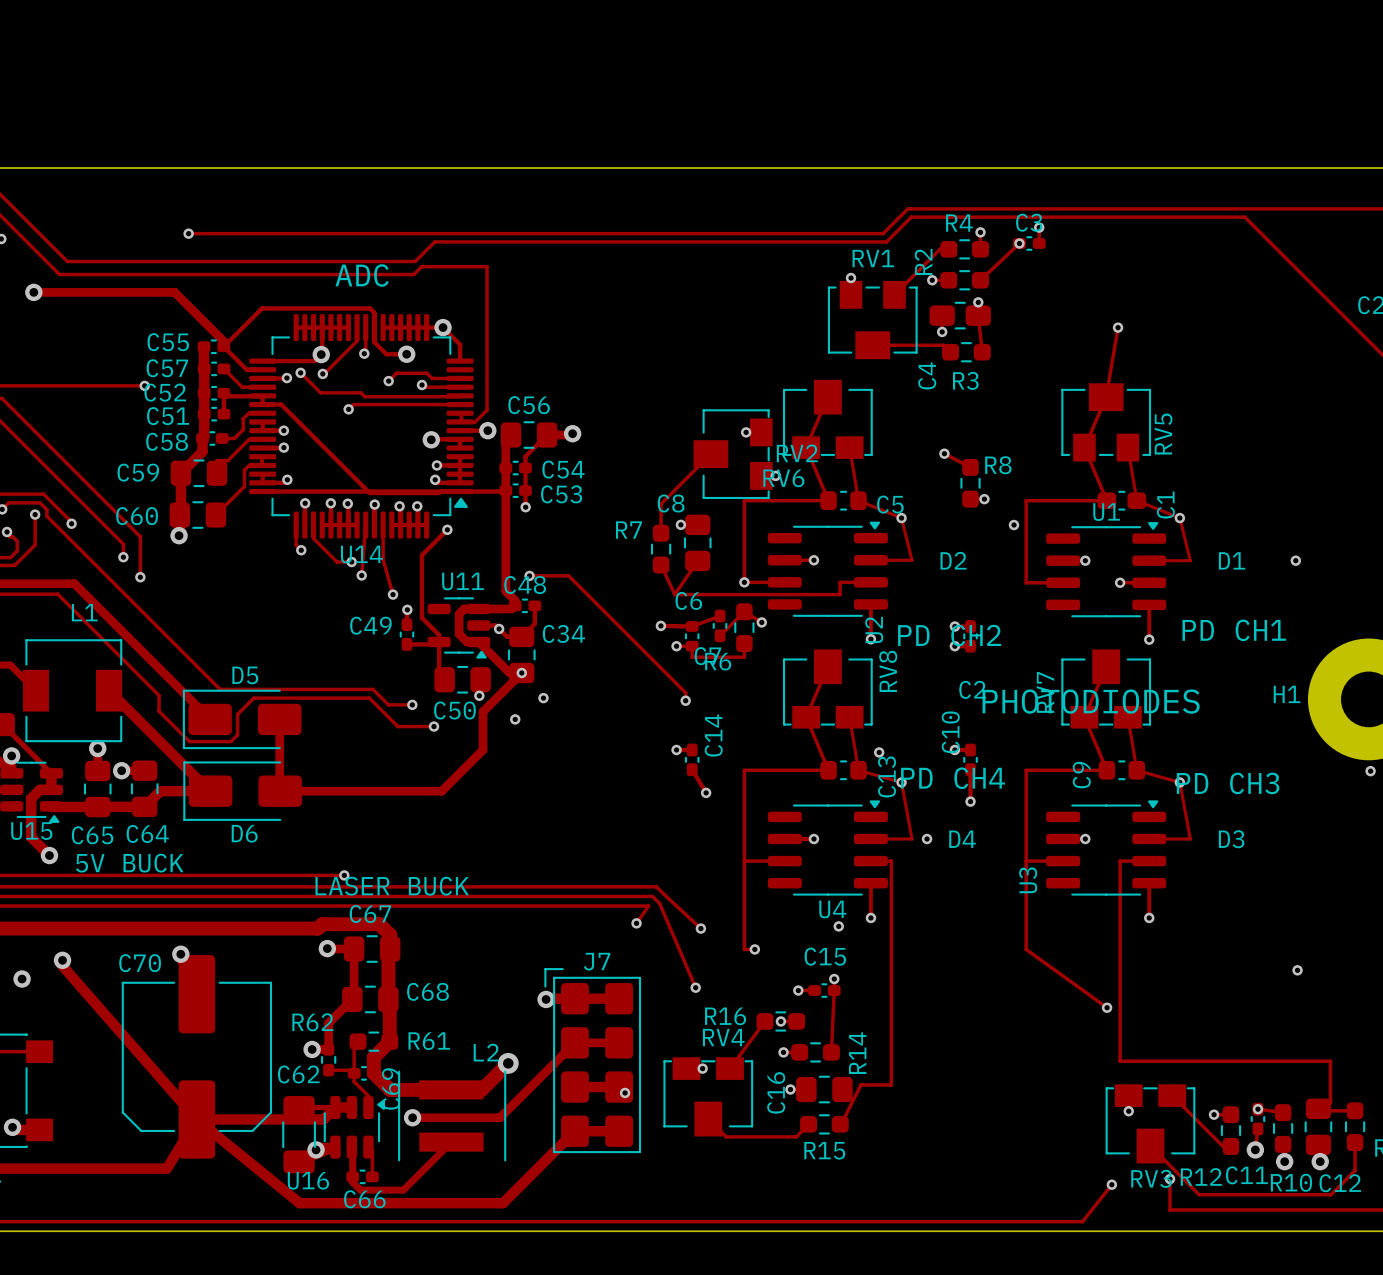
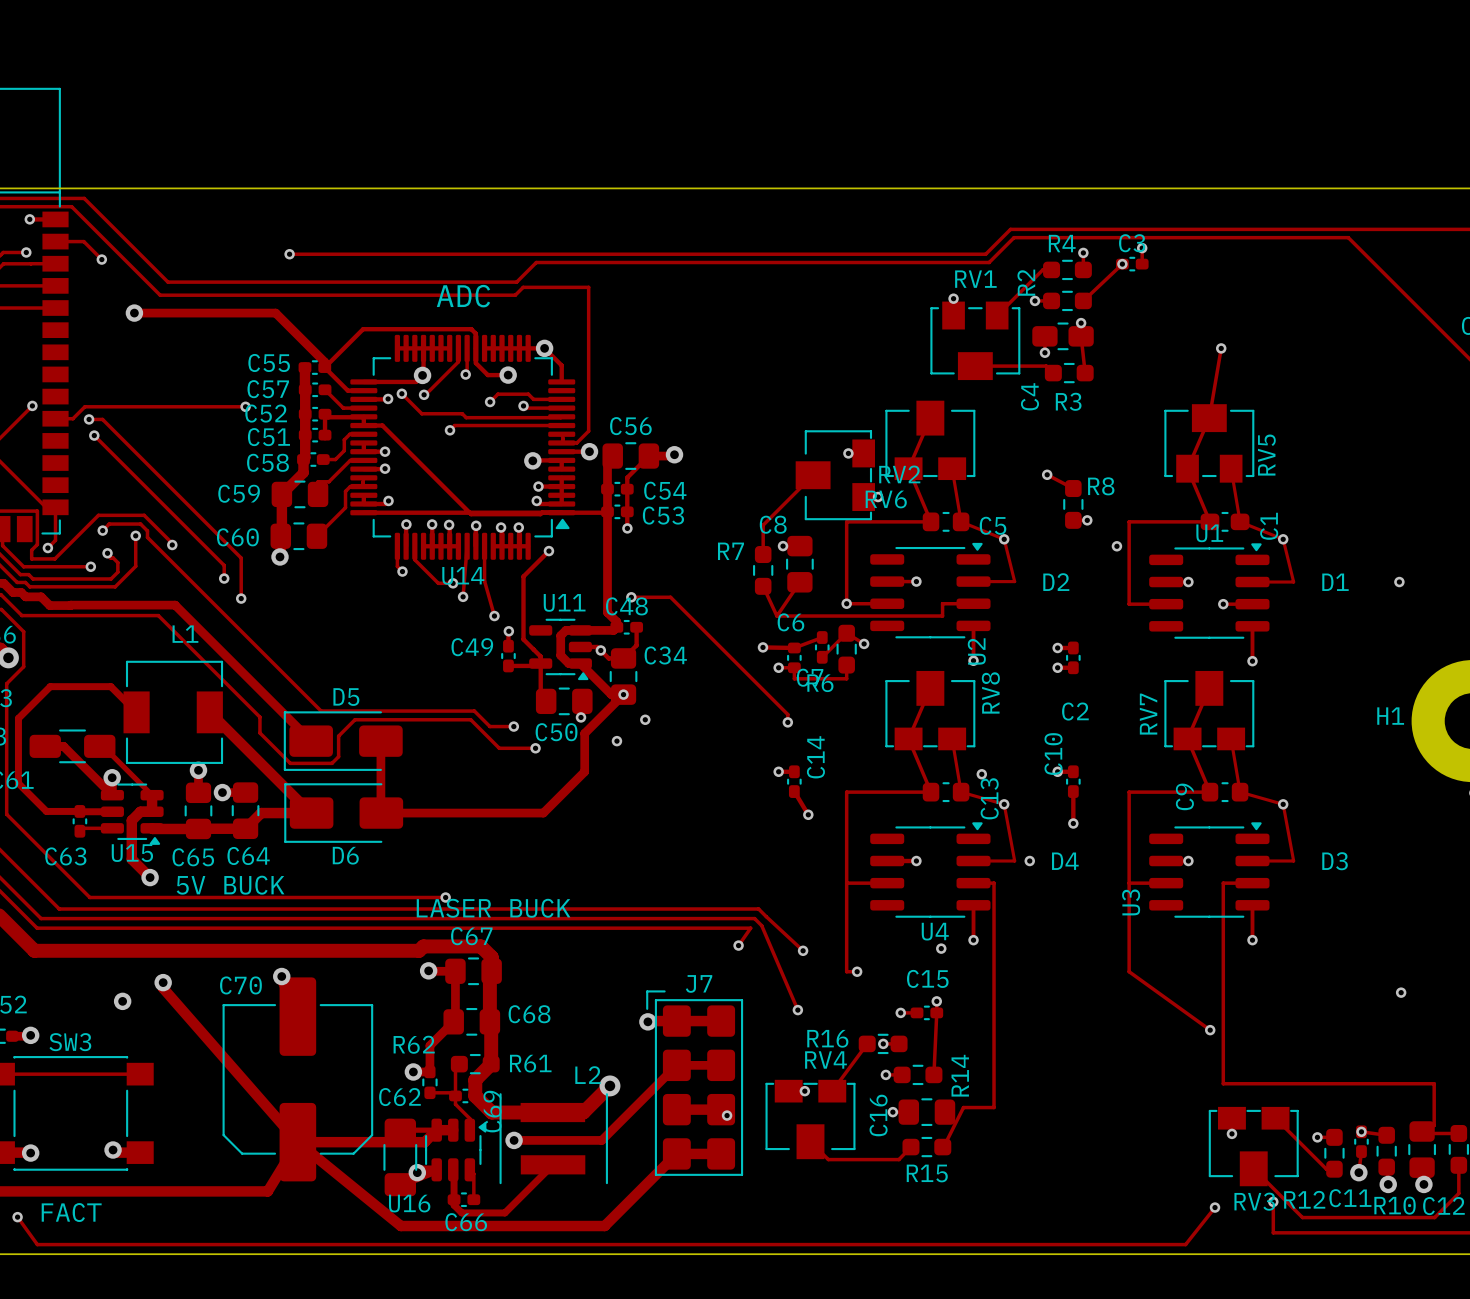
text: PD CH1 (1234, 630) -> none
text: PD CH2 (949, 635) -> none
text: PHOTODIODES (1091, 701) -> none
text: PD CH4 (953, 778) -> none
text: PD CH3 (1228, 783) -> none

